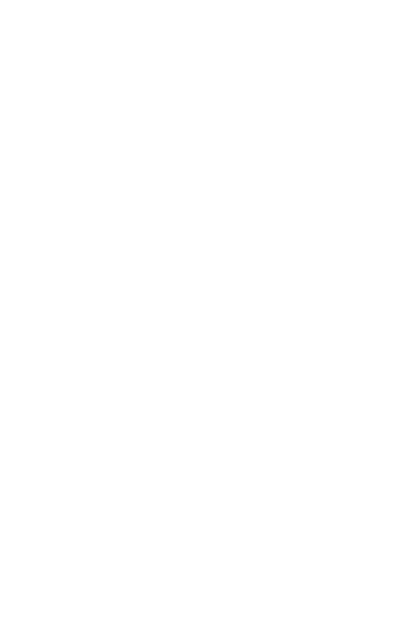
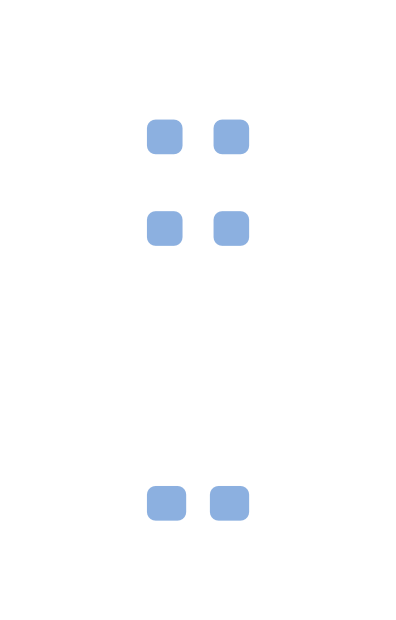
part: none -> (198, 136)
part: none -> (198, 228)
part: none -> (198, 503)

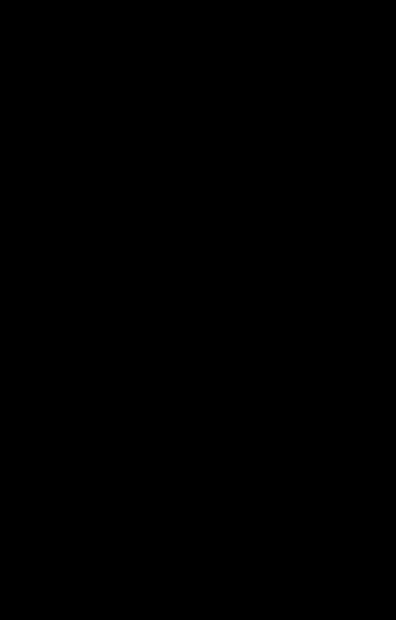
part: (198, 136) -> none
part: (198, 228) -> none
part: (198, 503) -> none

